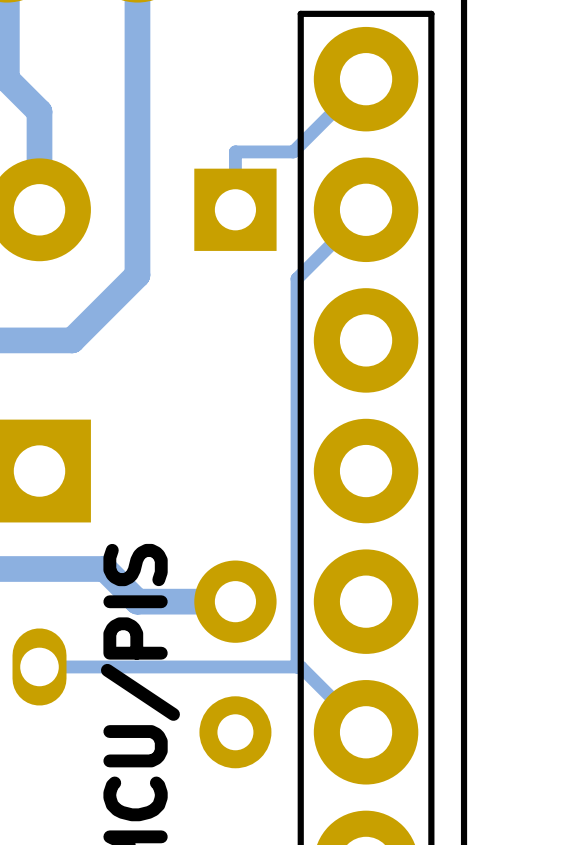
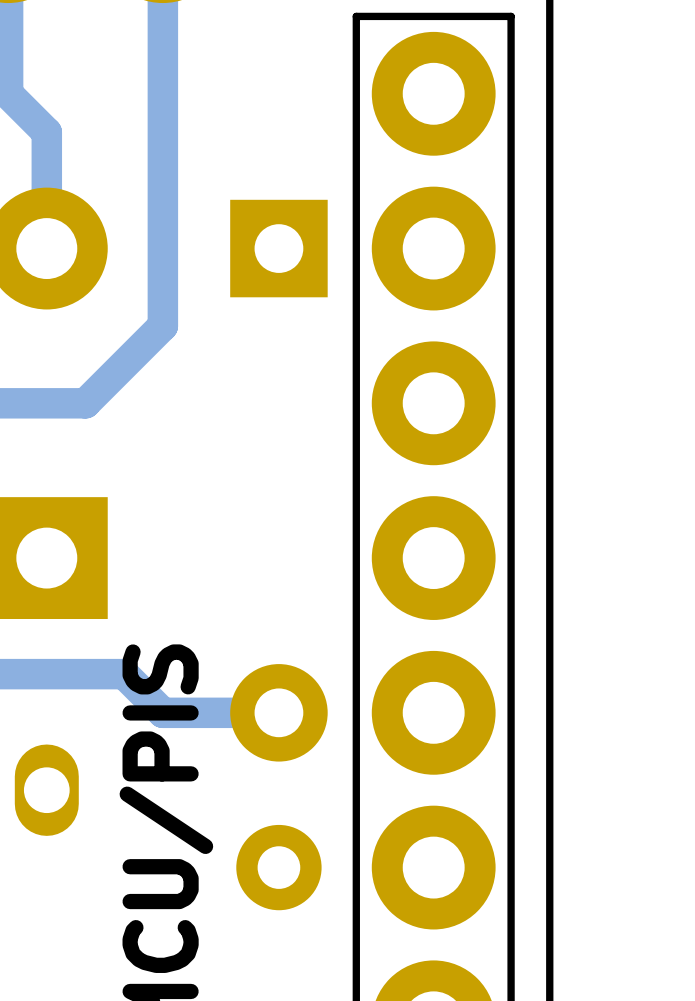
track: (366, 79) (293, 151) (235, 151) (235, 209) -> none
track: (366, 209) (297, 278) (297, 666) -> none
track: (39, 666) (300, 666) (366, 732) -> none

